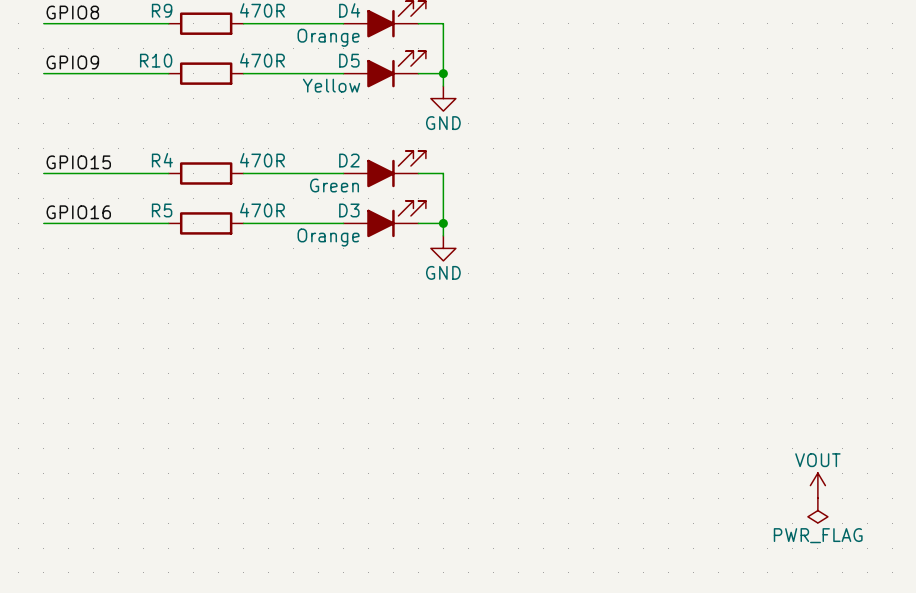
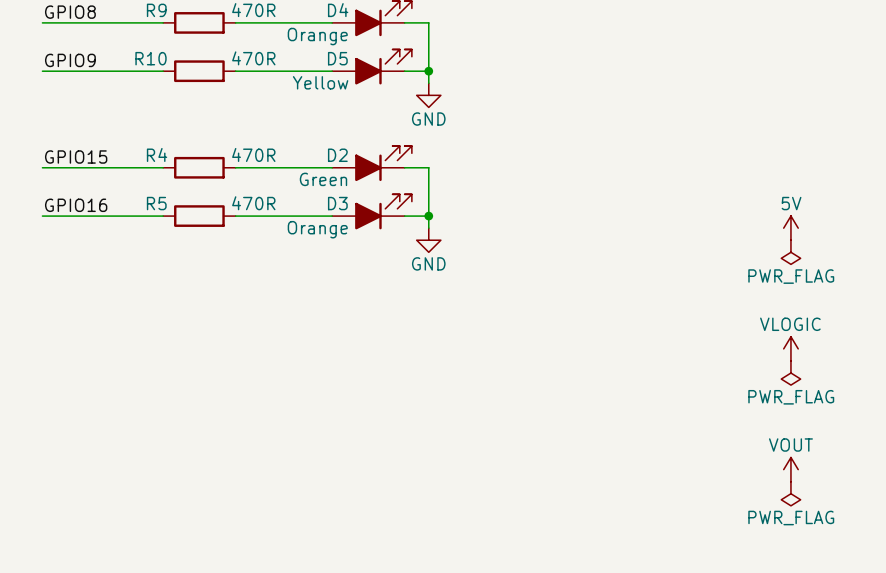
power symbol: none -> 5V (790, 228)
power symbol: none -> PWR_FLAG (790, 252)
power symbol: none -> VLOGIC (790, 348)
power symbol: none -> PWR_FLAG (790, 373)

